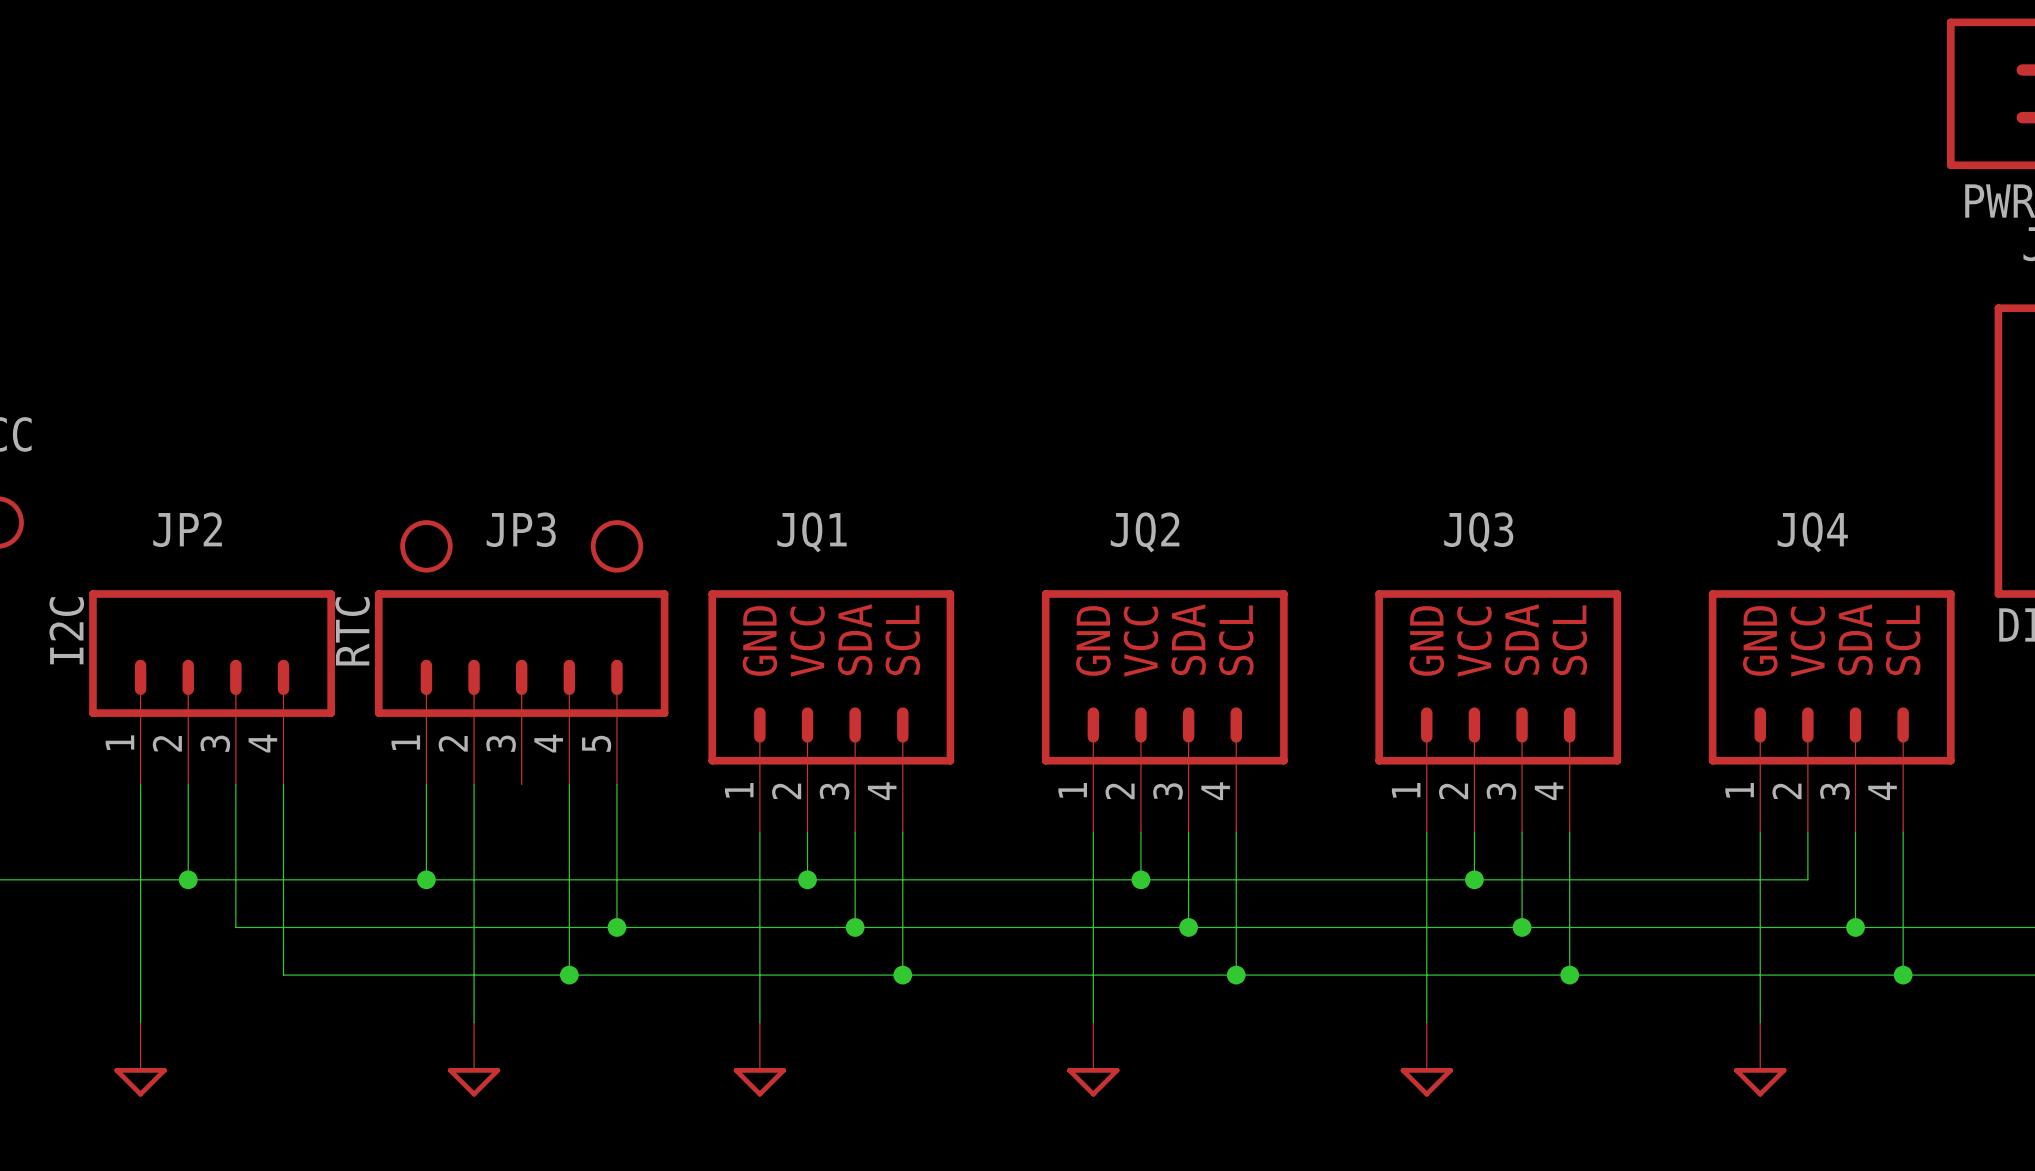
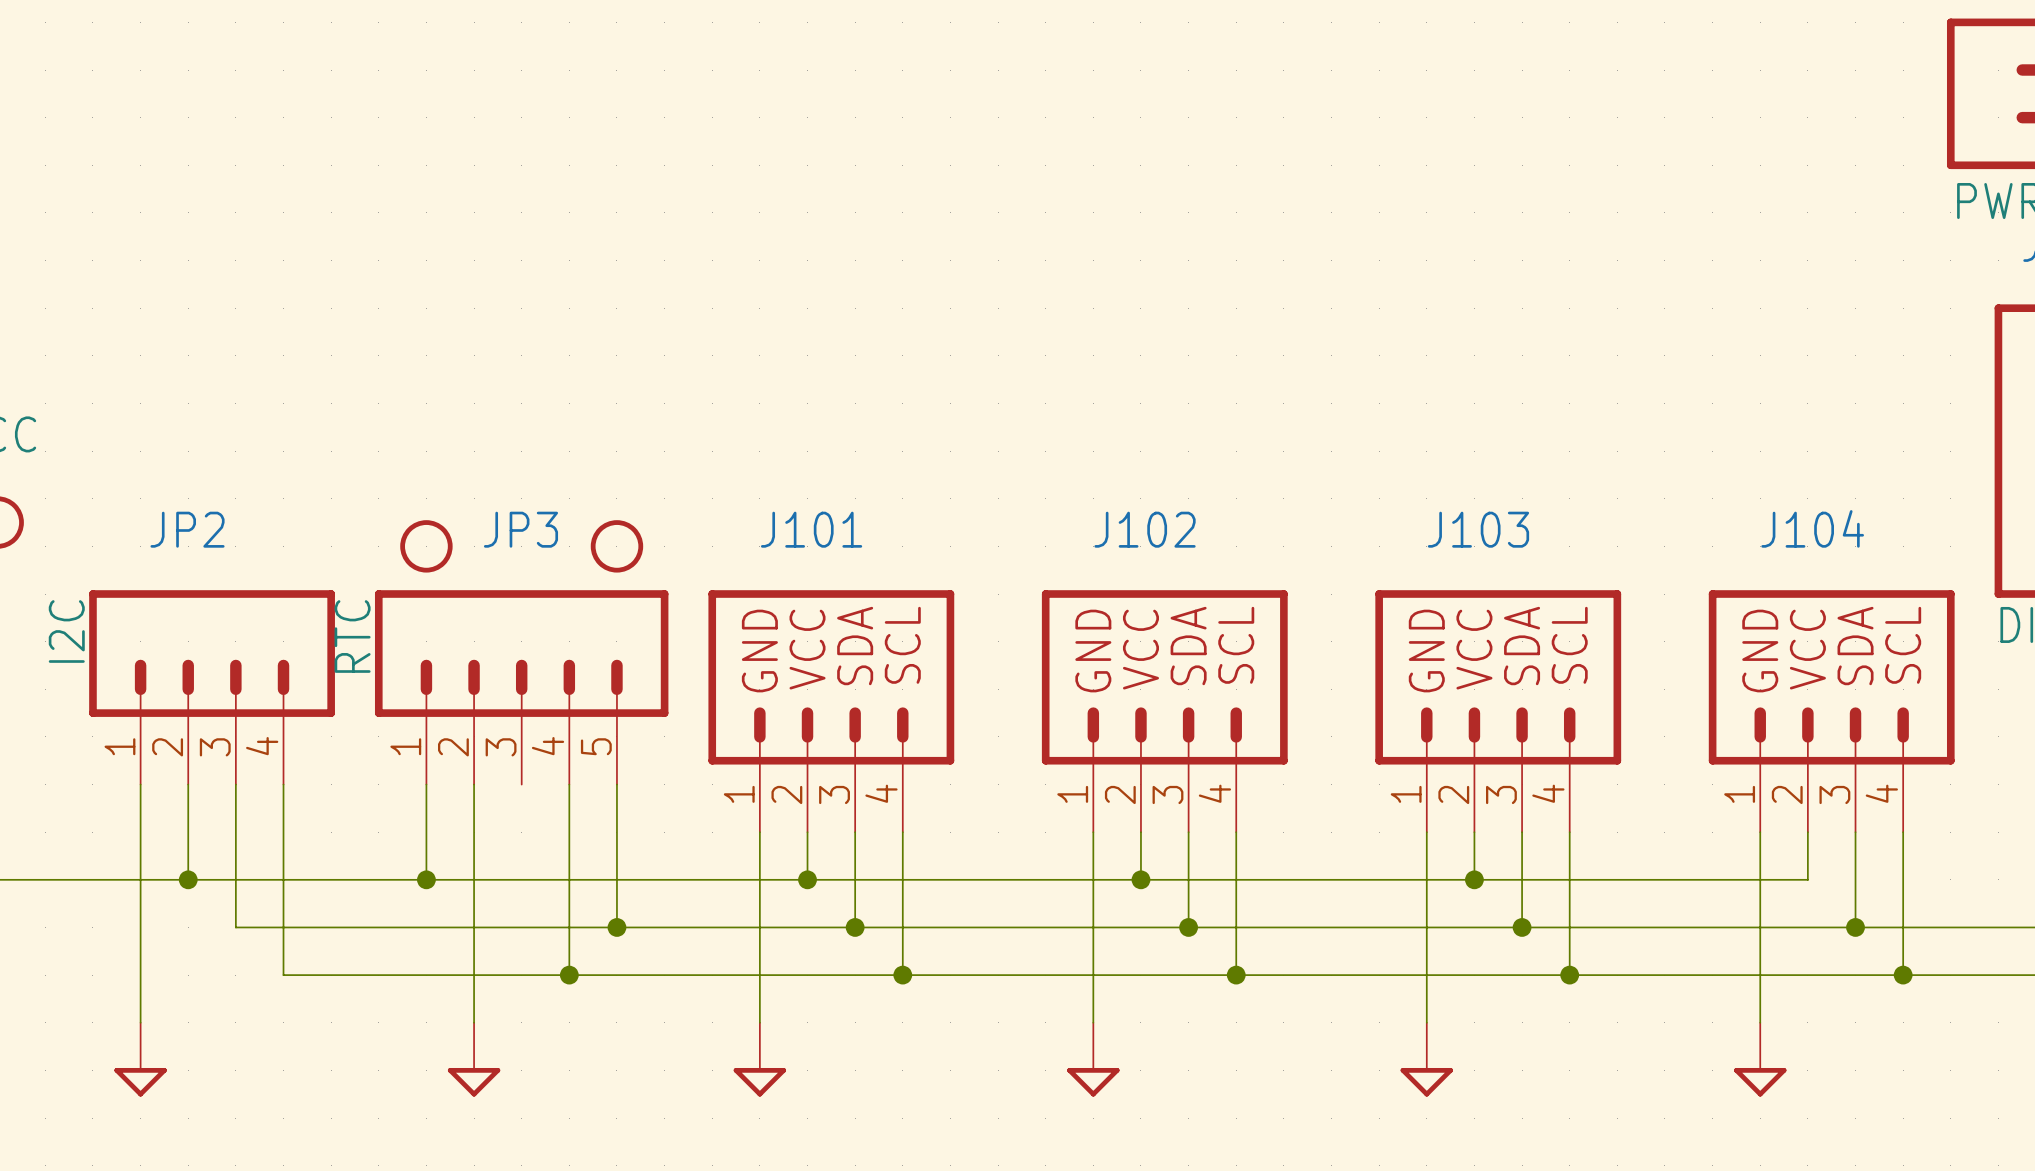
JQ1 name: JQ1 (811, 532) -> J101 (811, 529)
JQ2 name: JQ2 (1145, 532) -> J102 (1145, 529)
JQ3 name: JQ3 (1478, 532) -> J103 (1478, 529)
JQ4 name: JQ4 (1812, 532) -> J104 (1812, 528)

